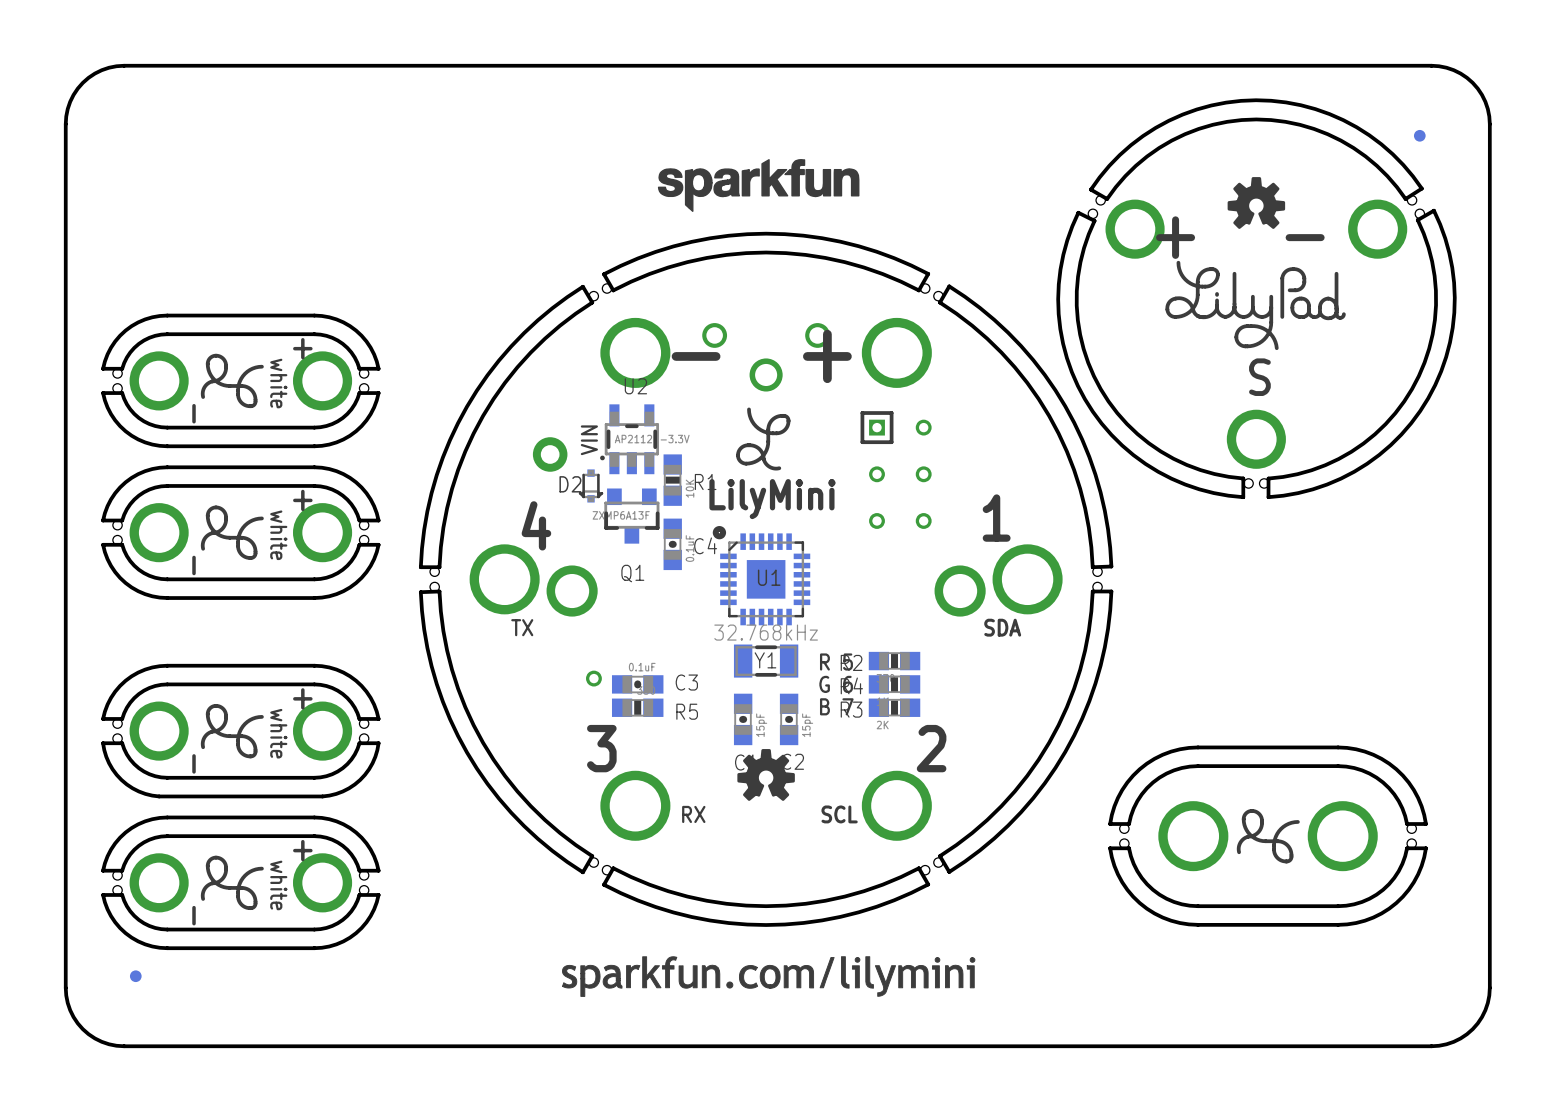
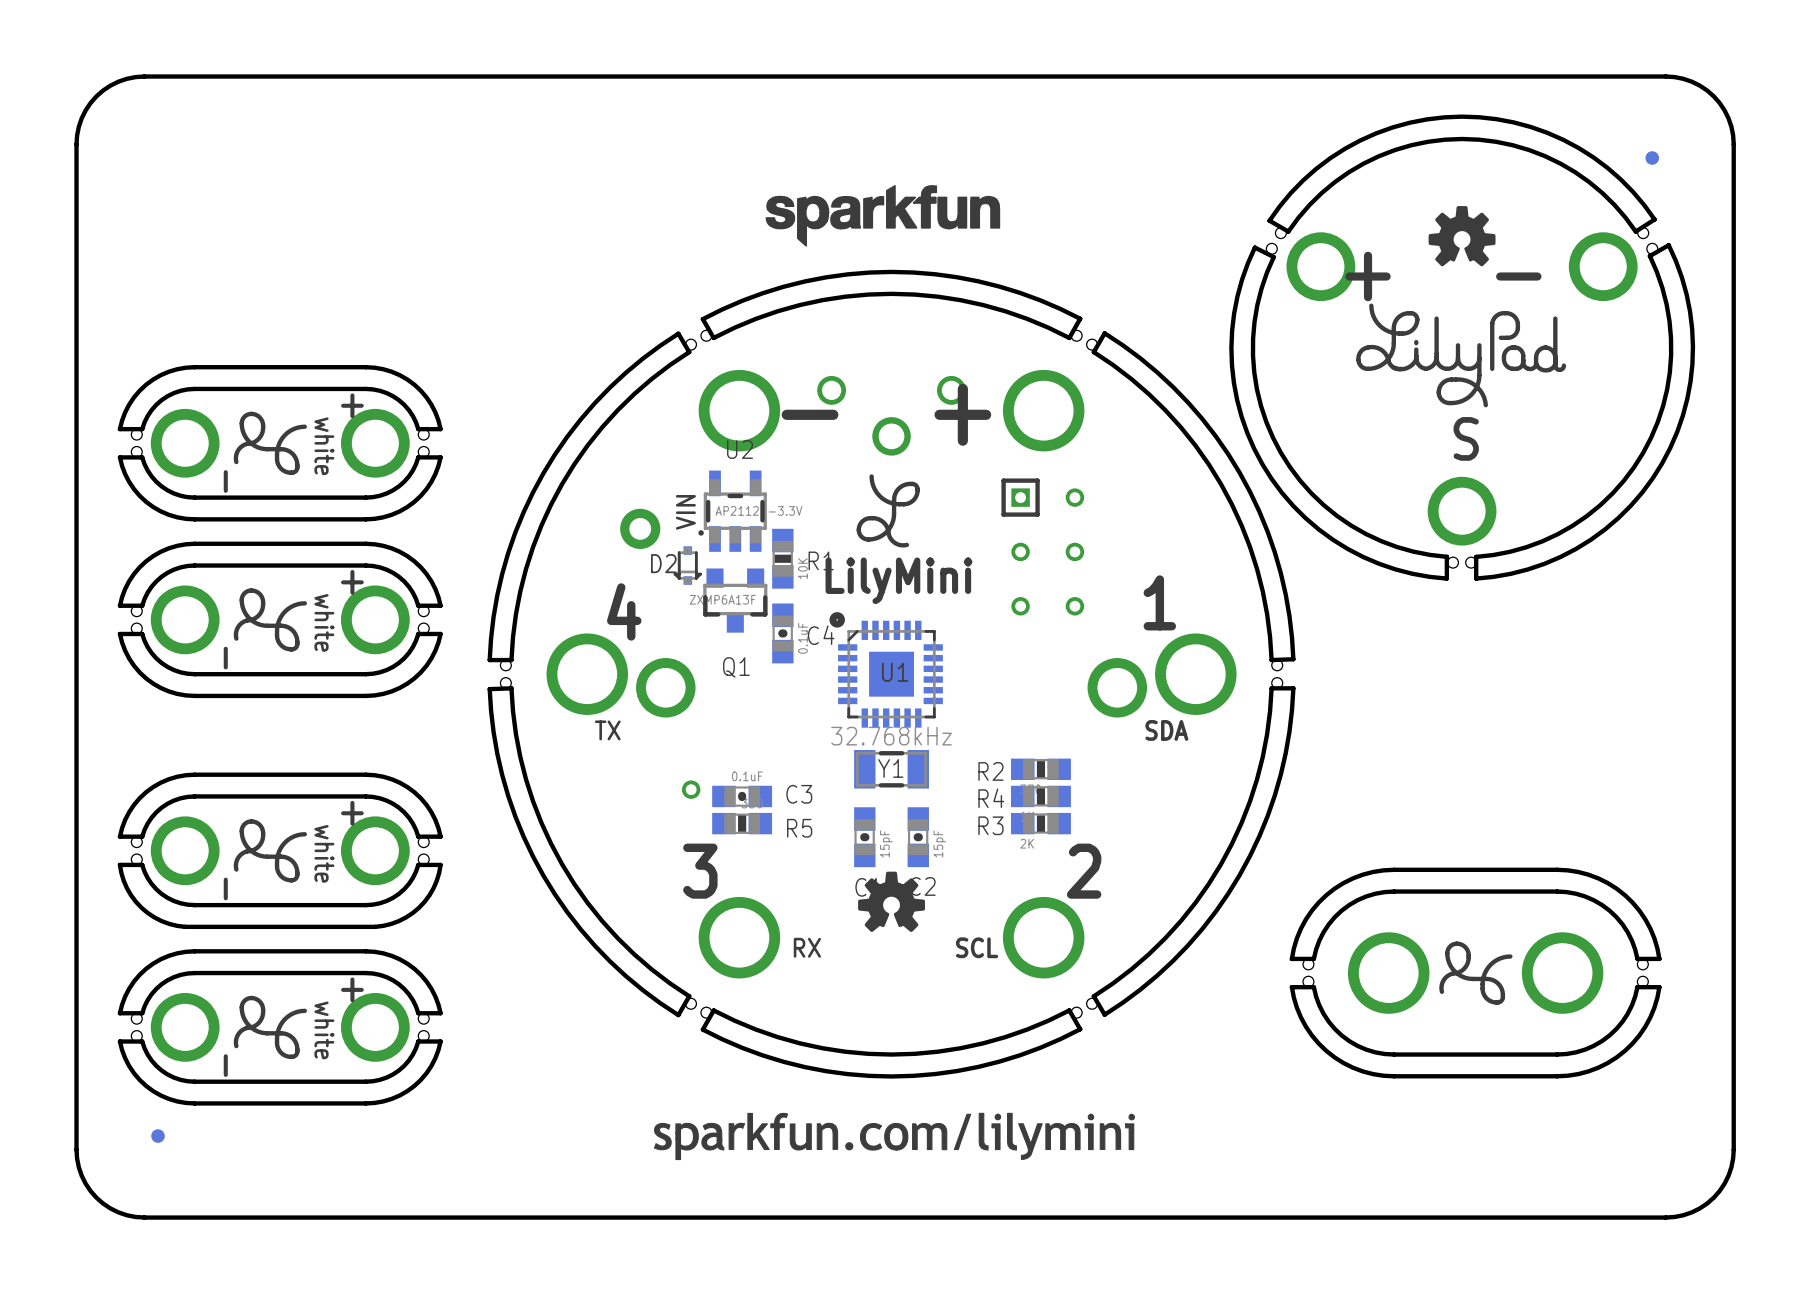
text: R 5 (836, 661) -> none
text: G 6 (836, 684) -> none
text: B 7 (836, 706) -> none

